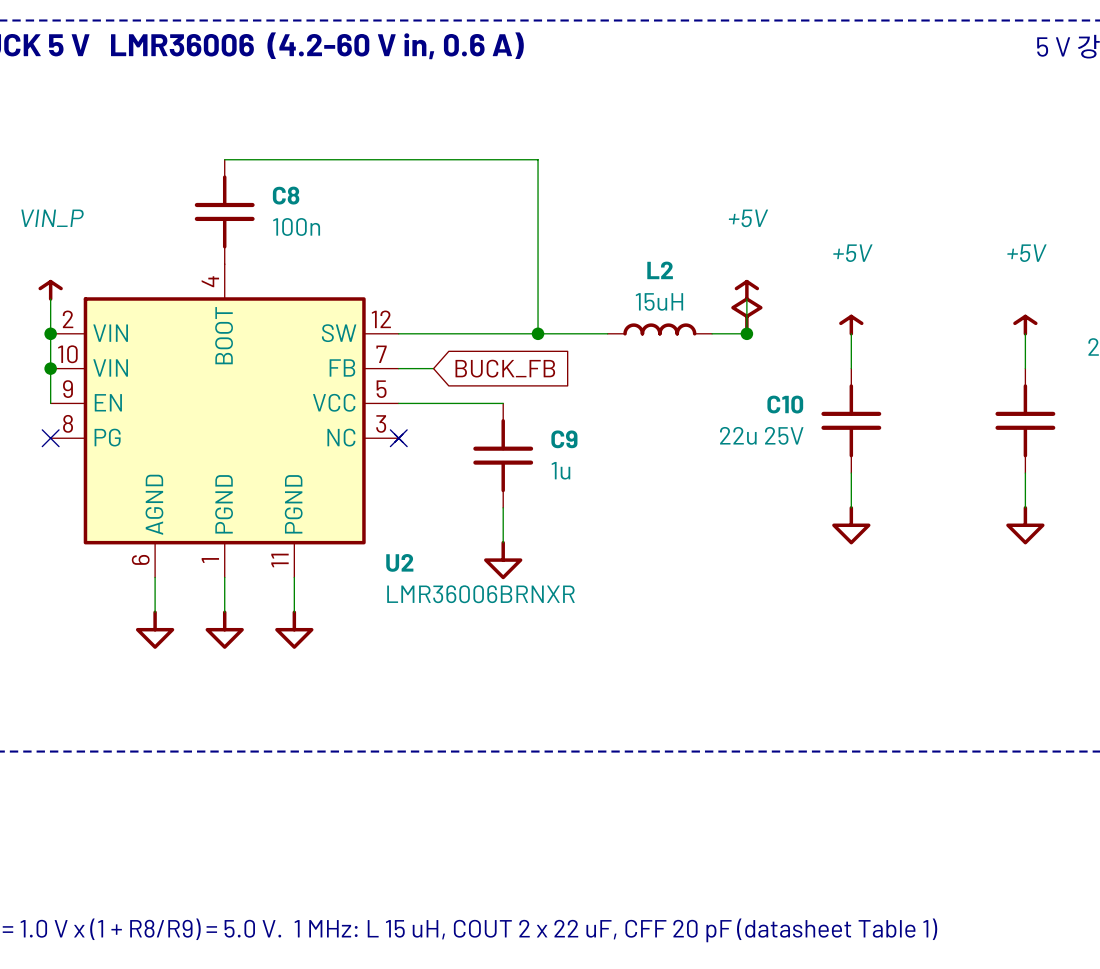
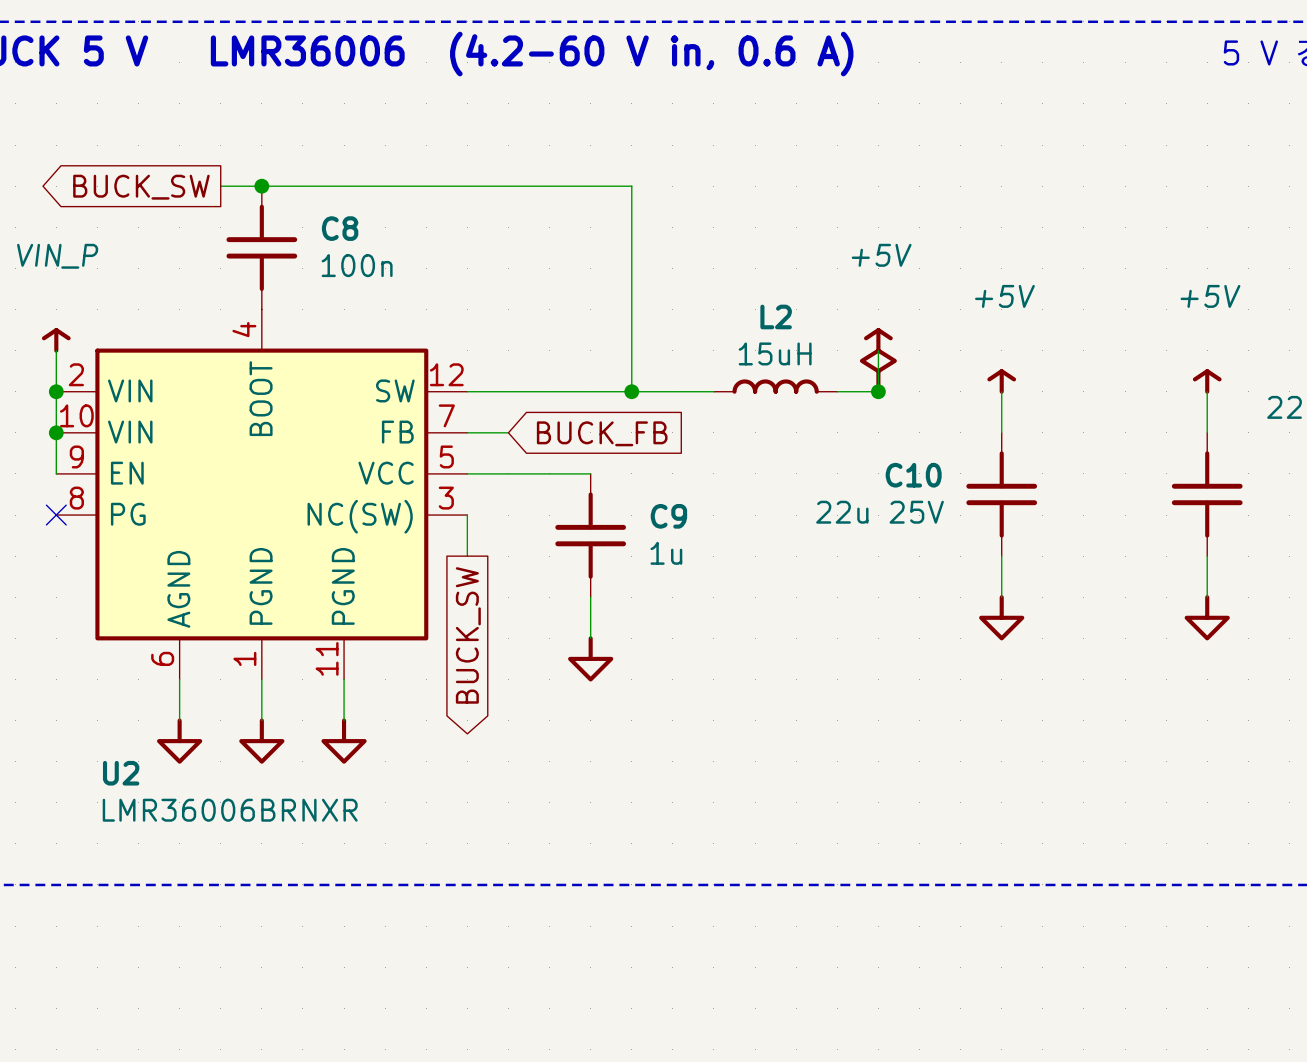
global label: none -> BUCK_SW (141, 187)
wire: none -> (220, 186) (261, 186)
junction: none -> (261, 186)
U2 symbol: [50, 264, 403, 578] -> [56, 309, 468, 680]
wire: none -> (467, 515) (467, 556)
no-connect mark: (398, 438) -> none
global label: none -> BUCK_SW (468, 635)
U2 name position: U2 (399, 562) -> U2 (121, 773)
U2 value position: LMR36006BRNXR (480, 594) -> LMR36006BRNXR (230, 810)

